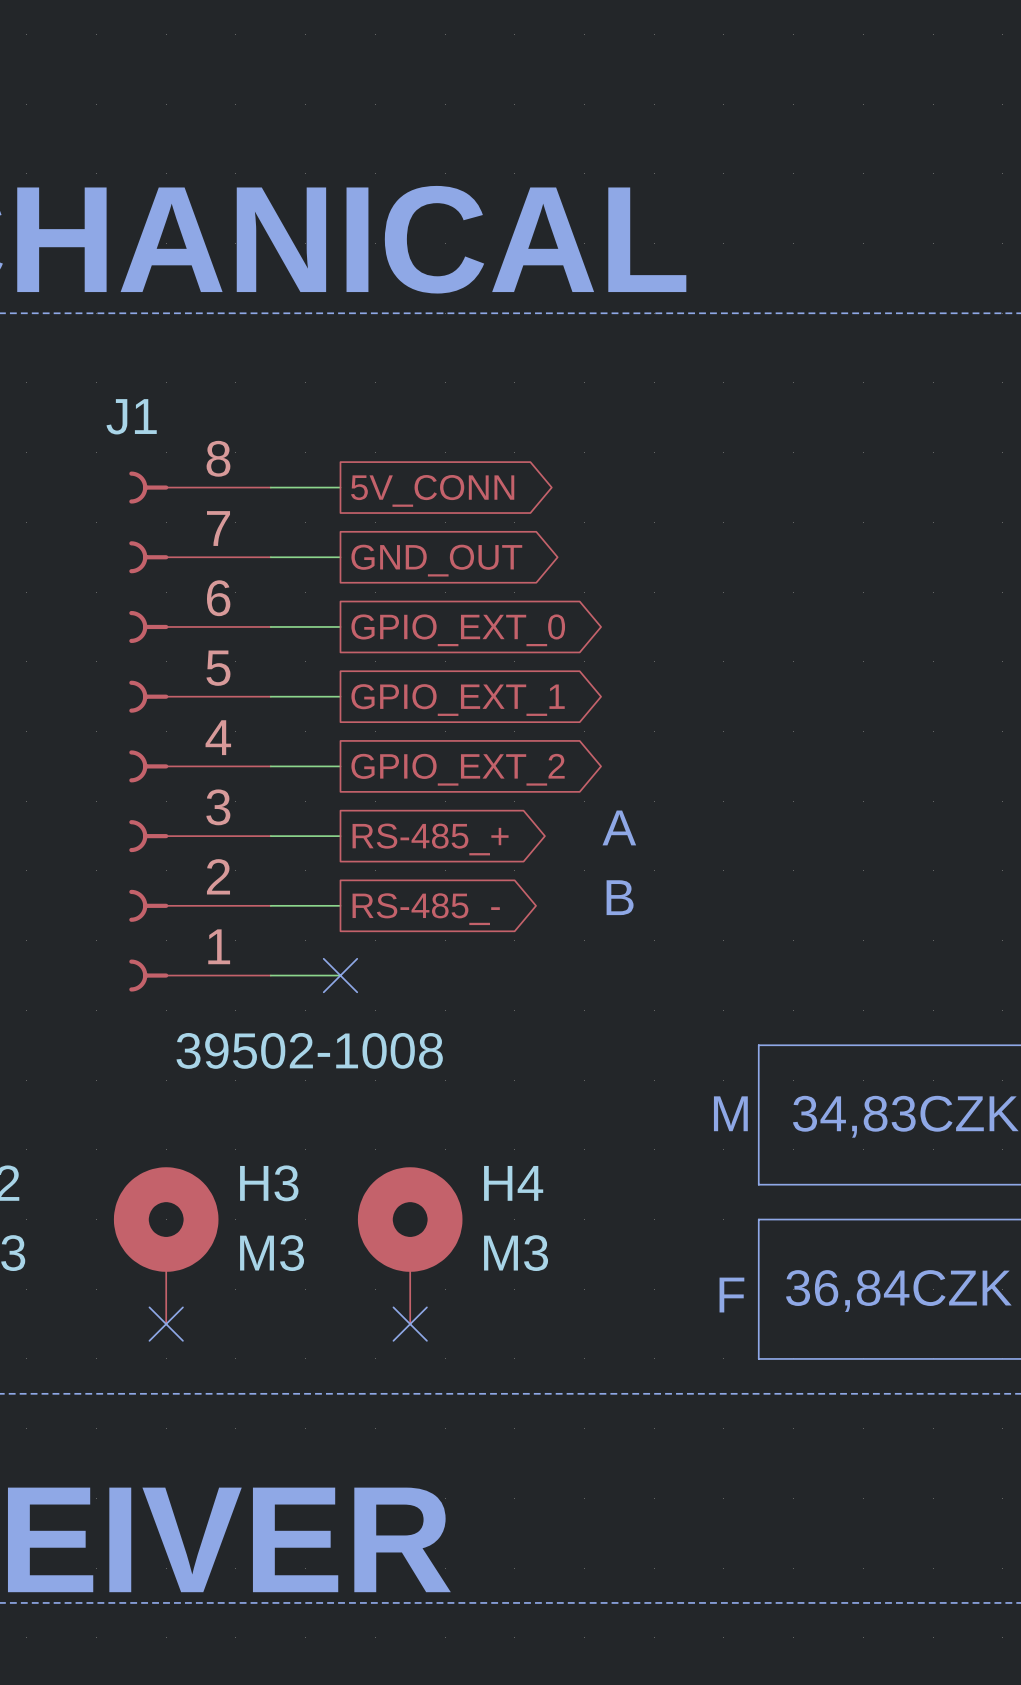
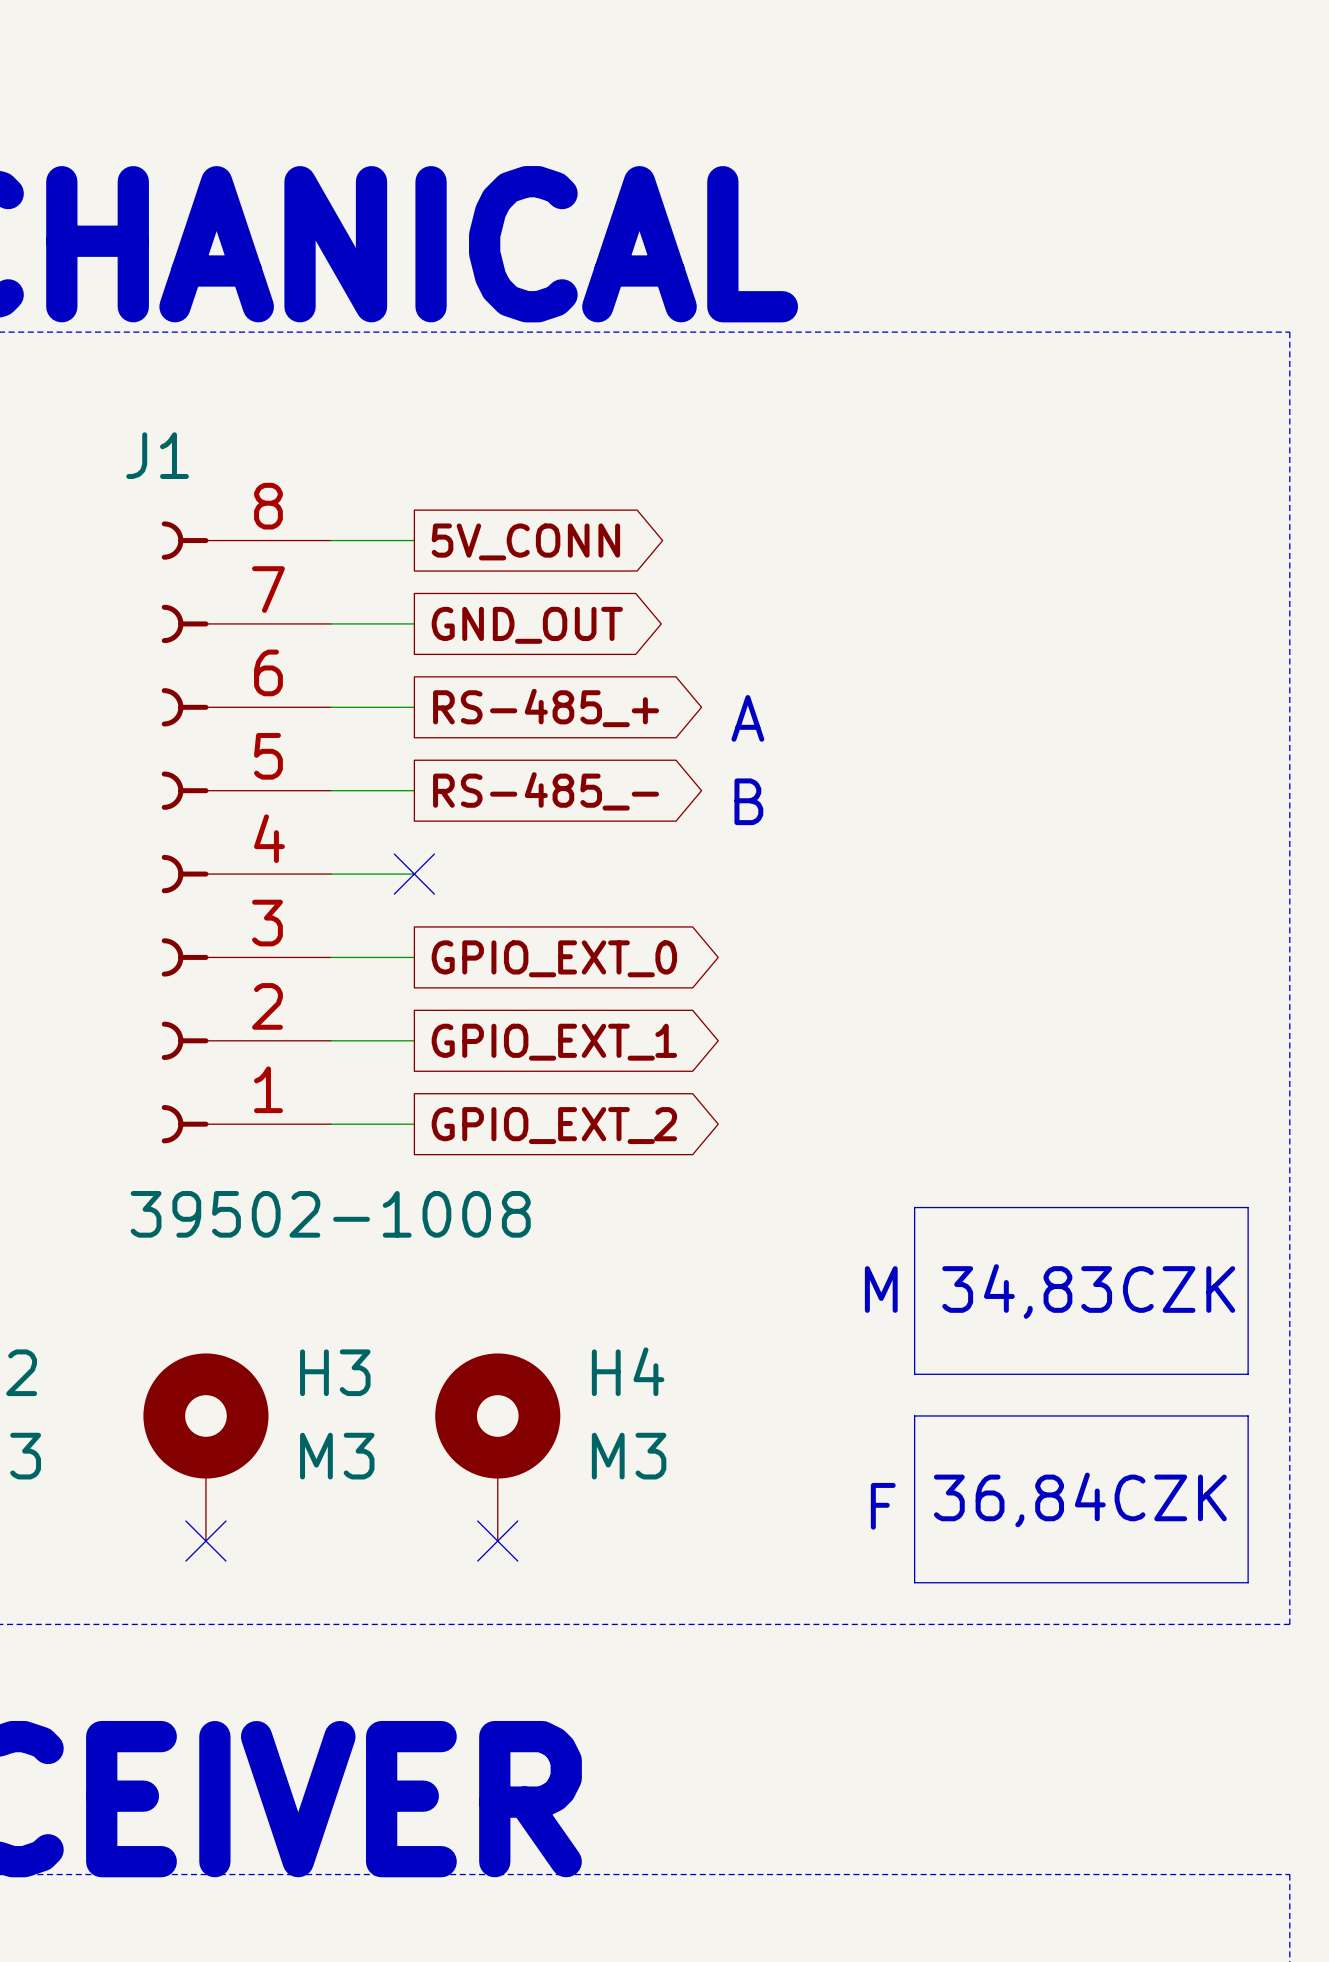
global label: GPIO_EXT_0 (458, 630) -> RS-485_+ (546, 708)
global label: GPIO_EXT_1 (458, 700) -> RS-485_- (546, 791)
no-connect mark: none -> (414, 874)
global label position: GPIO_EXT_2 (458, 769) -> GPIO_EXT_2 (554, 1125)
text position: A (619, 827) -> A (747, 718)
global label: RS-485_+ (430, 839) -> GPIO_EXT_0 (554, 958)
text position: B (620, 897) -> B (748, 801)
global label: RS-485_- (426, 909) -> GPIO_EXT_1 (554, 1042)
no-connect mark: (340, 975) -> none

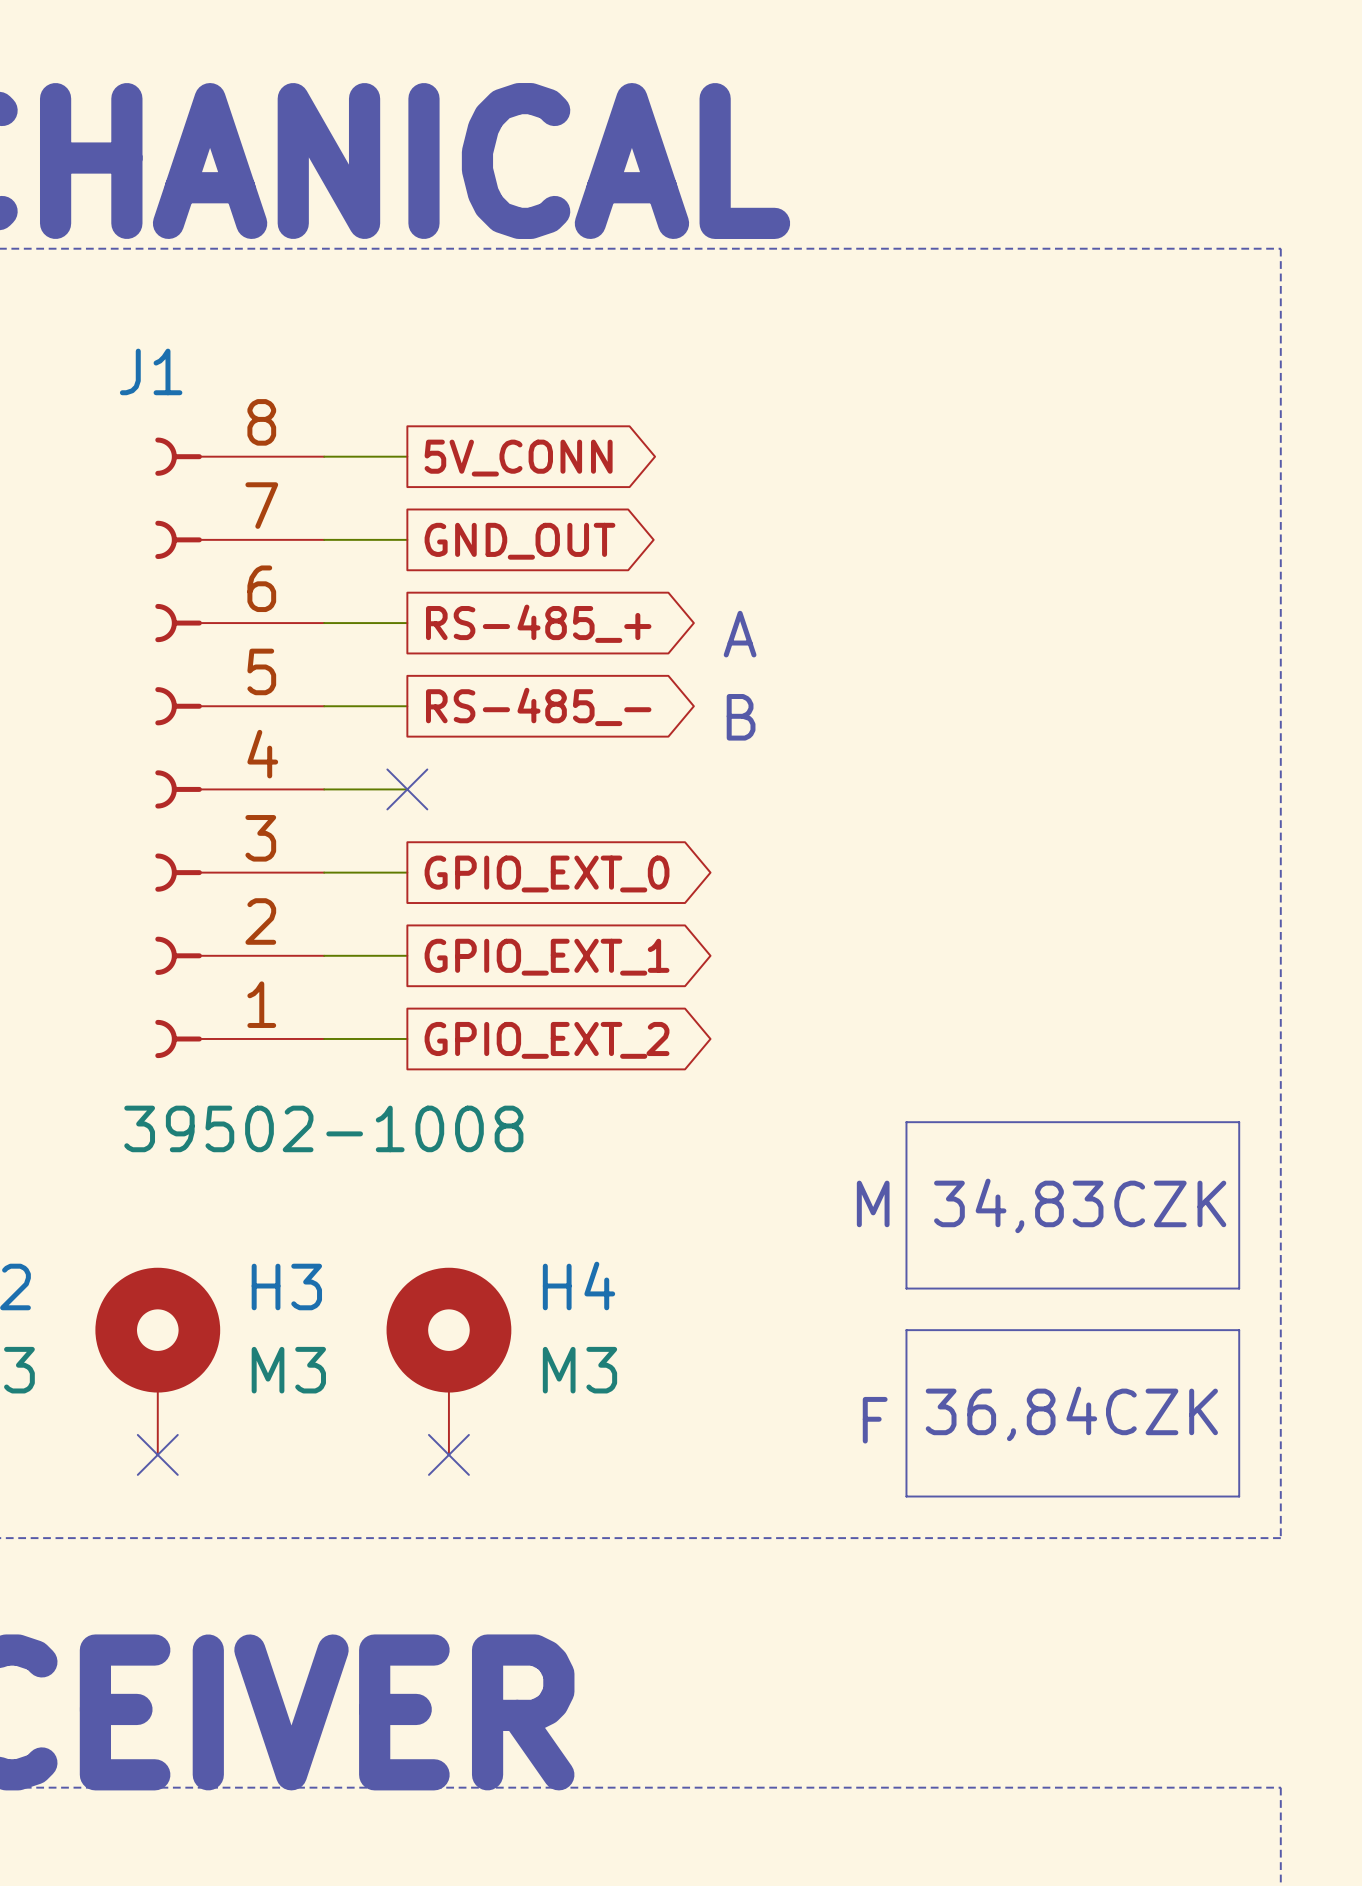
H3 position: (205, 1447) -> (157, 1361)
H4 position: (497, 1447) -> (448, 1361)
no-connect mark position: (205, 1541) -> (157, 1454)
no-connect mark position: (497, 1541) -> (448, 1454)

